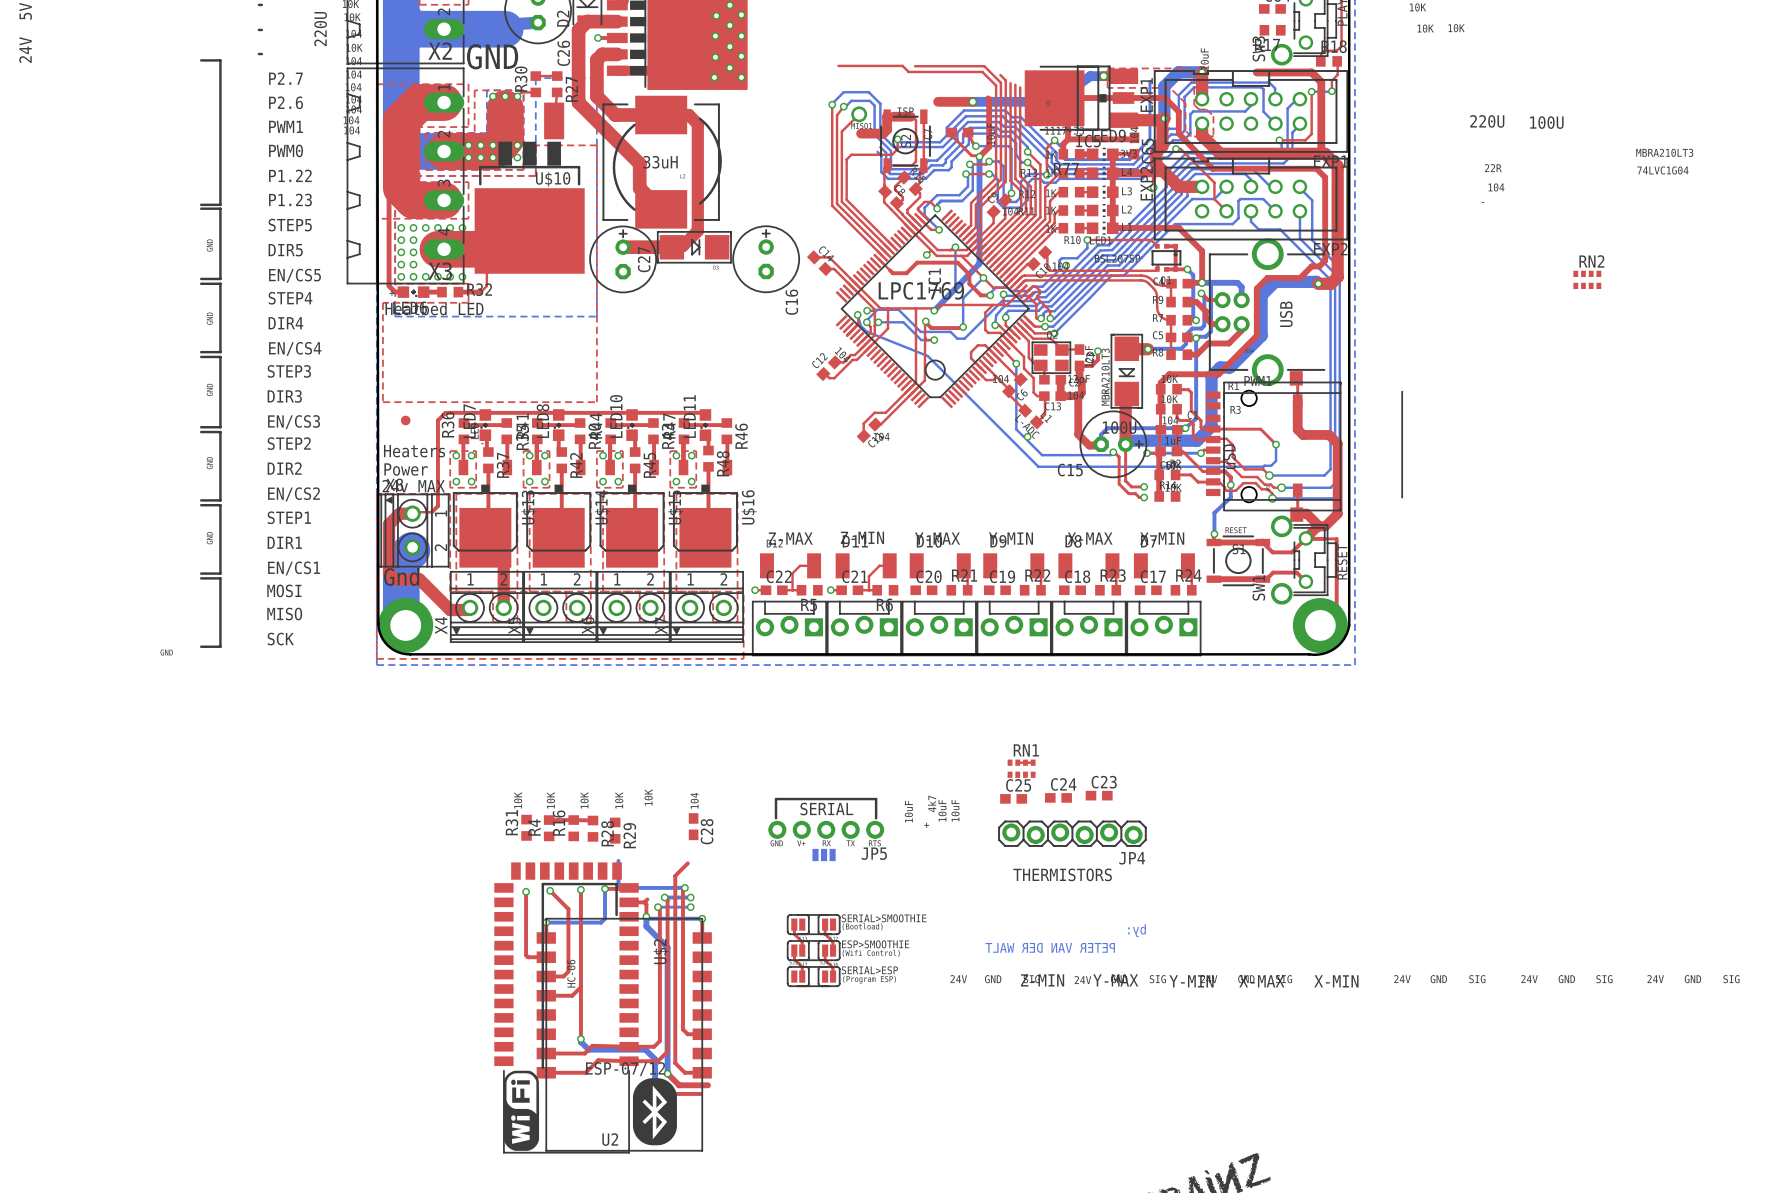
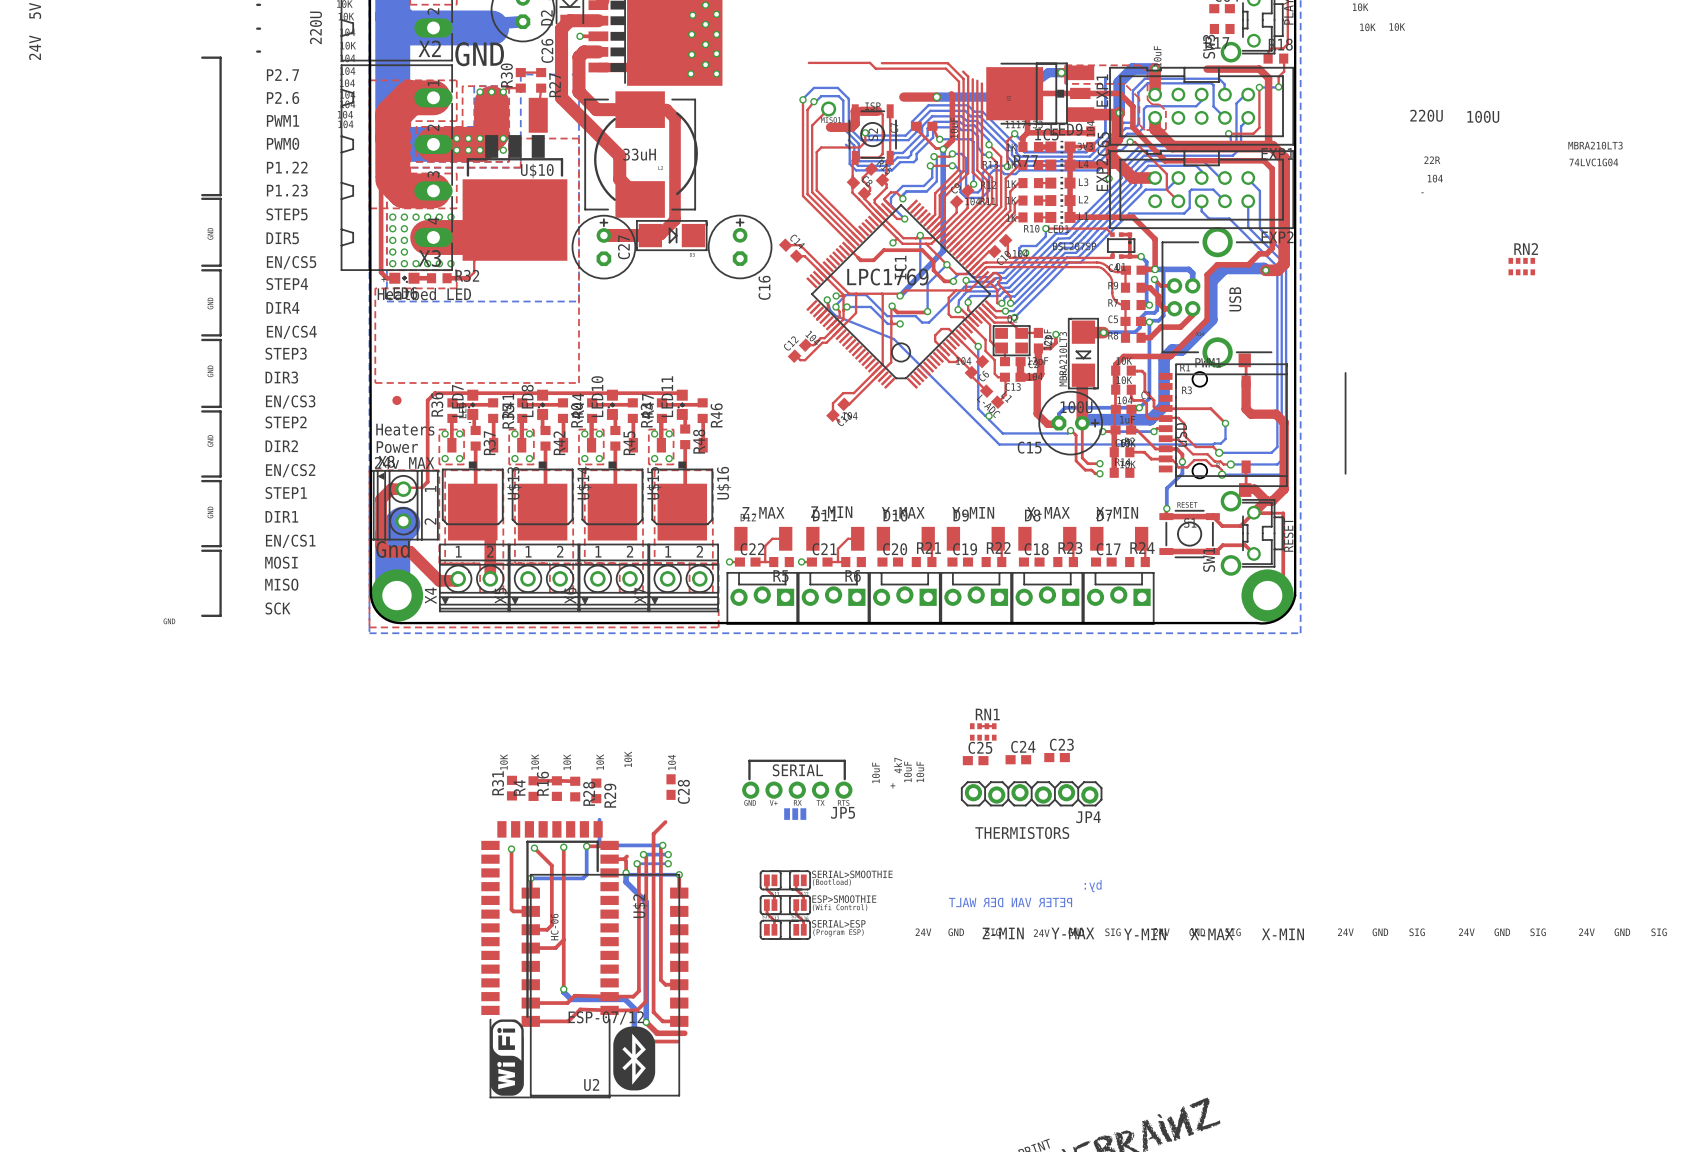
top track: none -> (832, 415) (839, 421)

